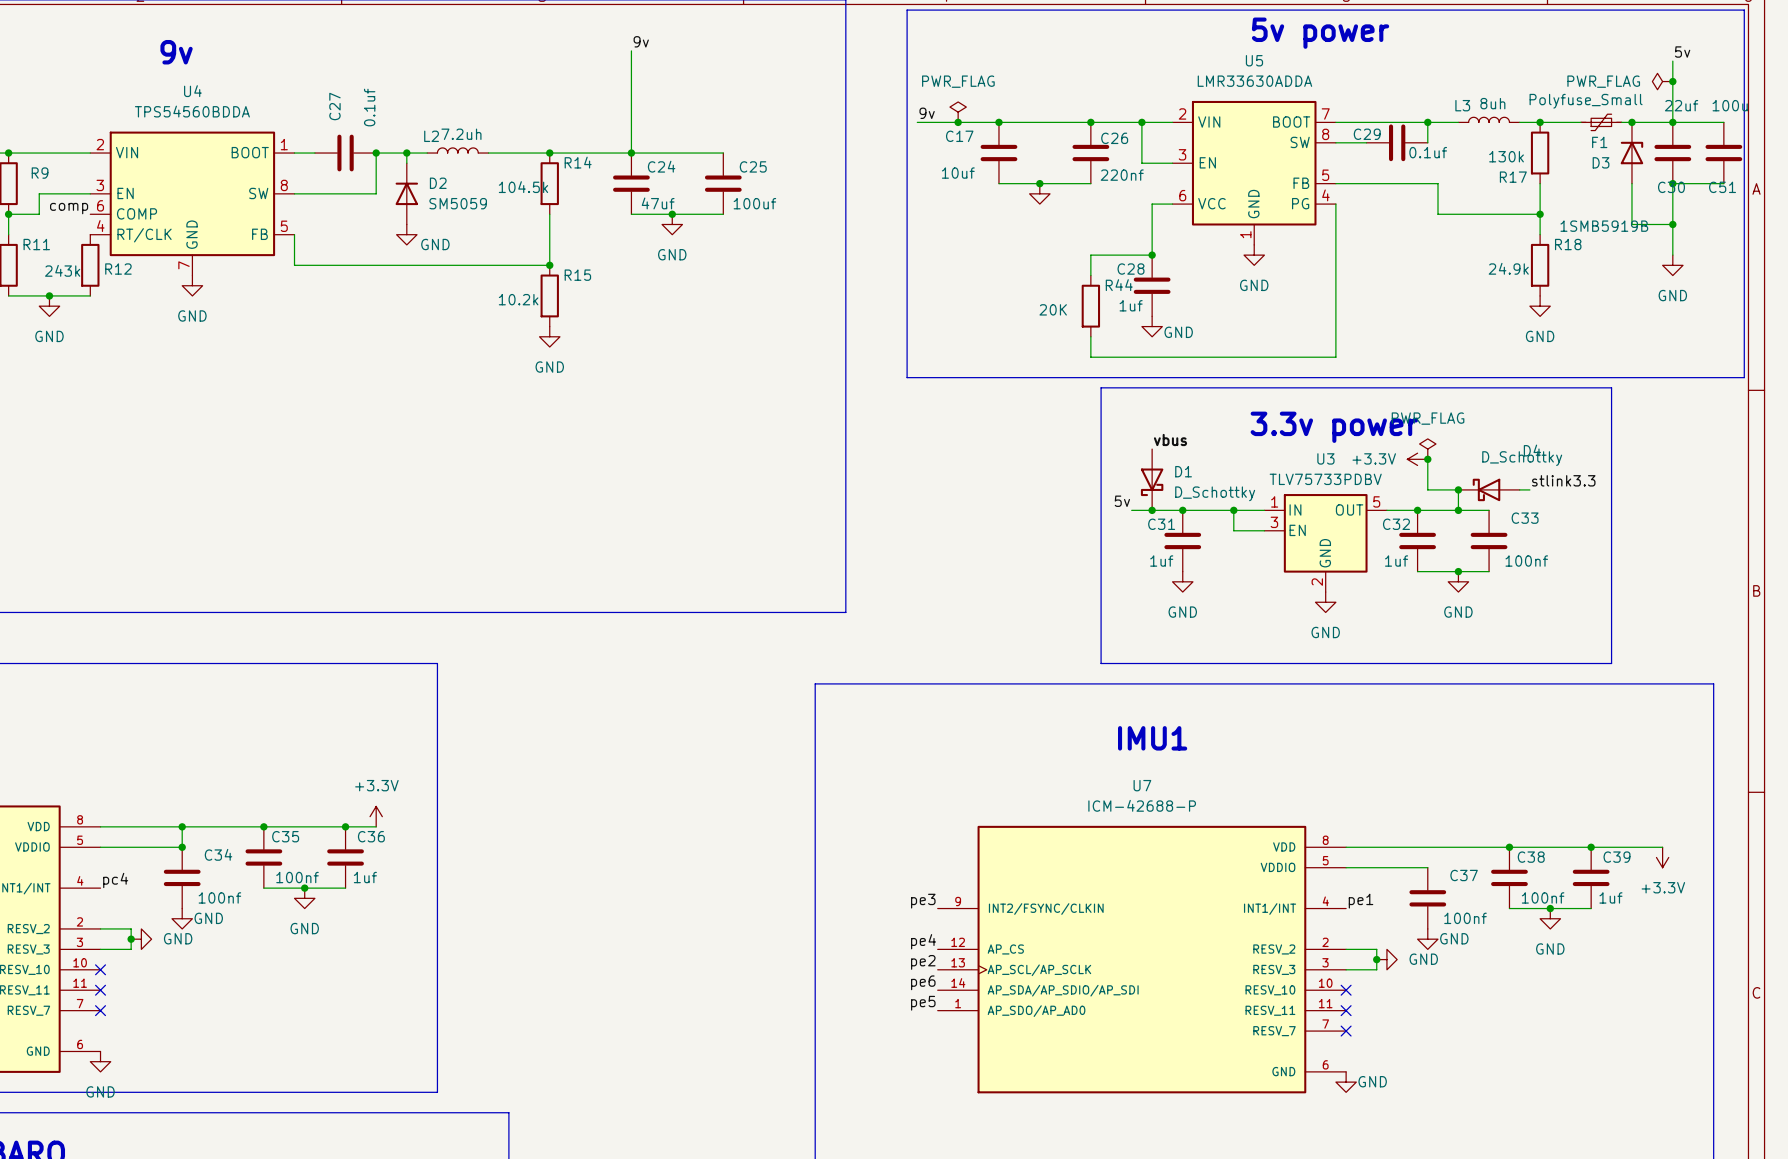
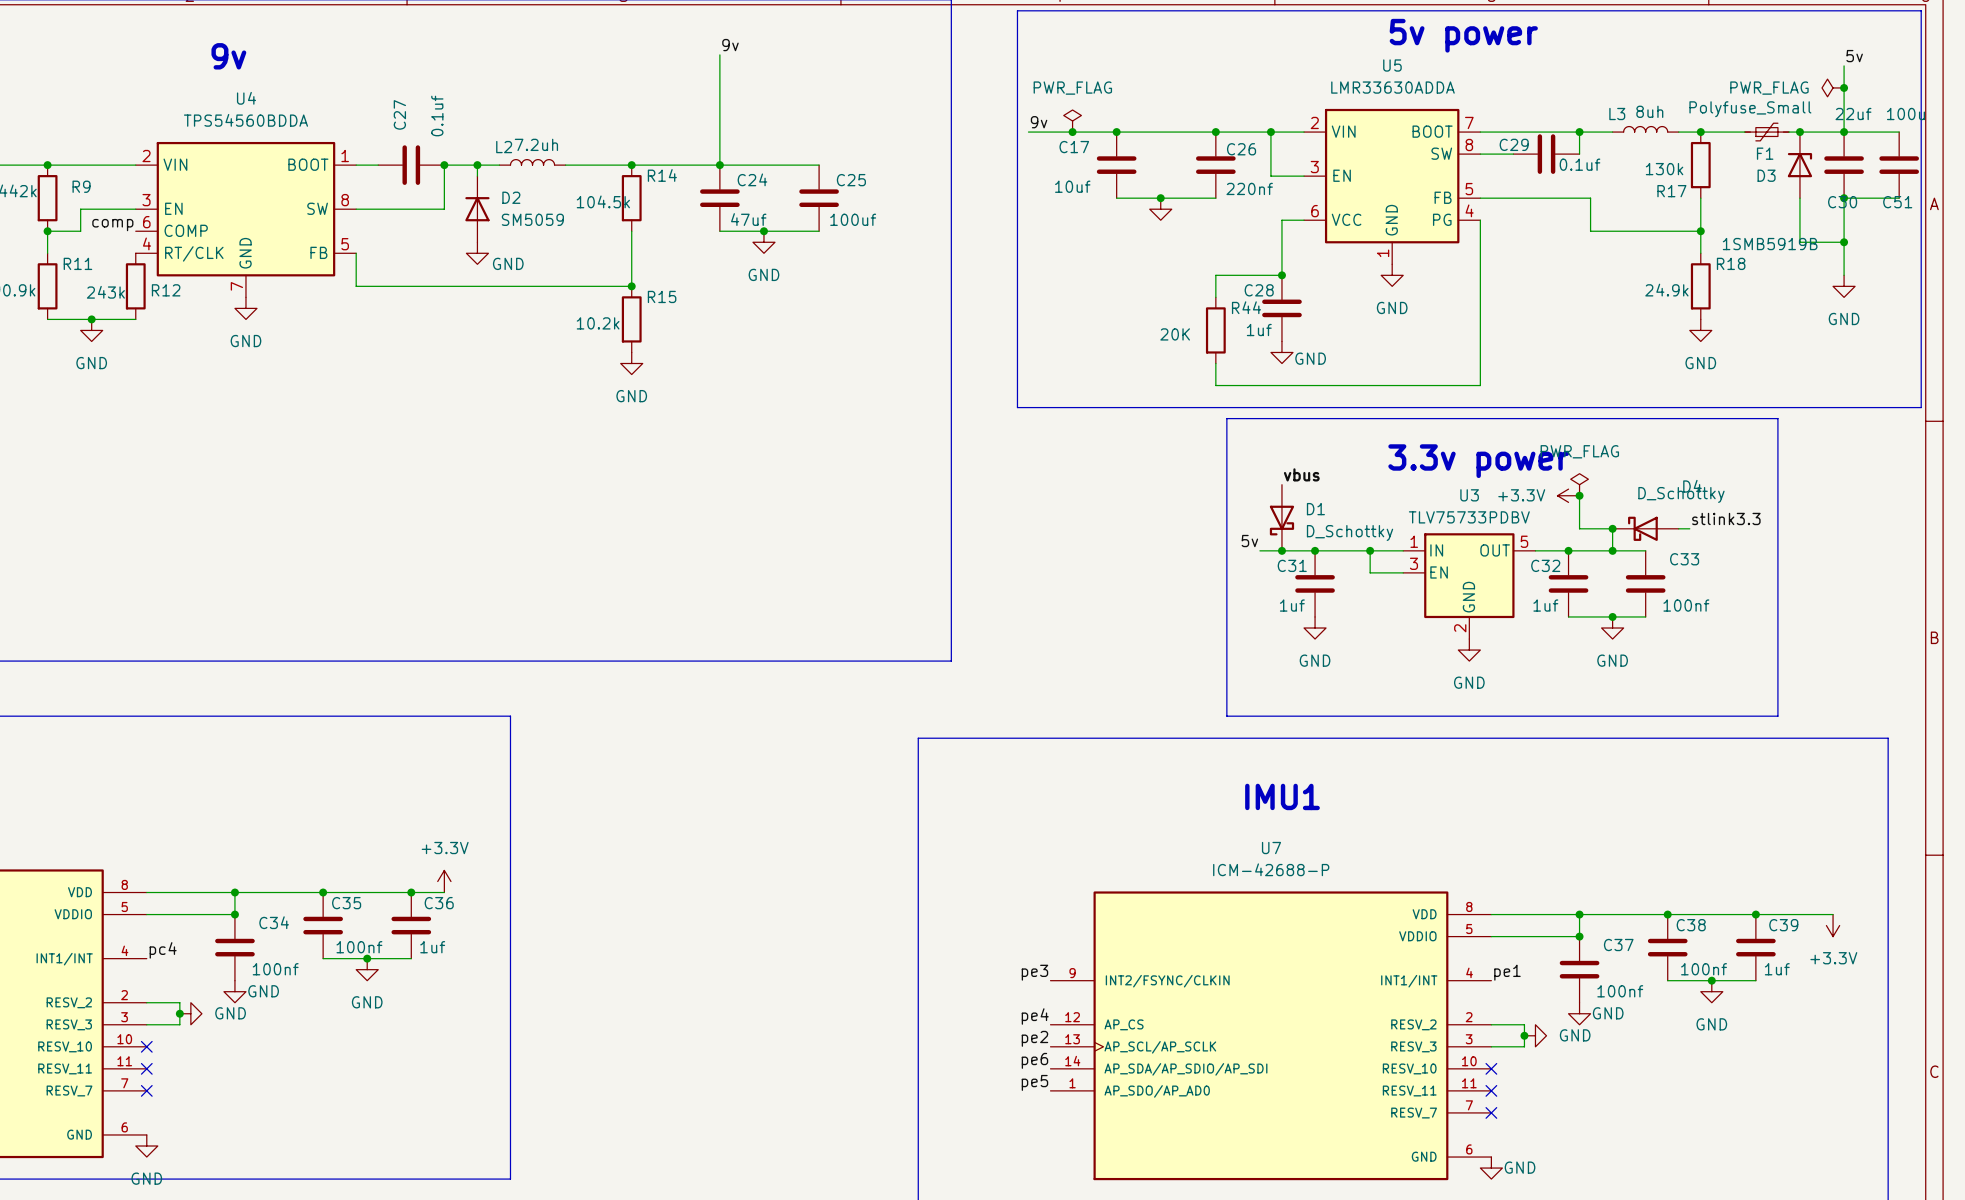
wire: none -> (1579, 914) (1579, 936)
junction: none -> (1579, 914)
junction: none -> (1579, 936)

